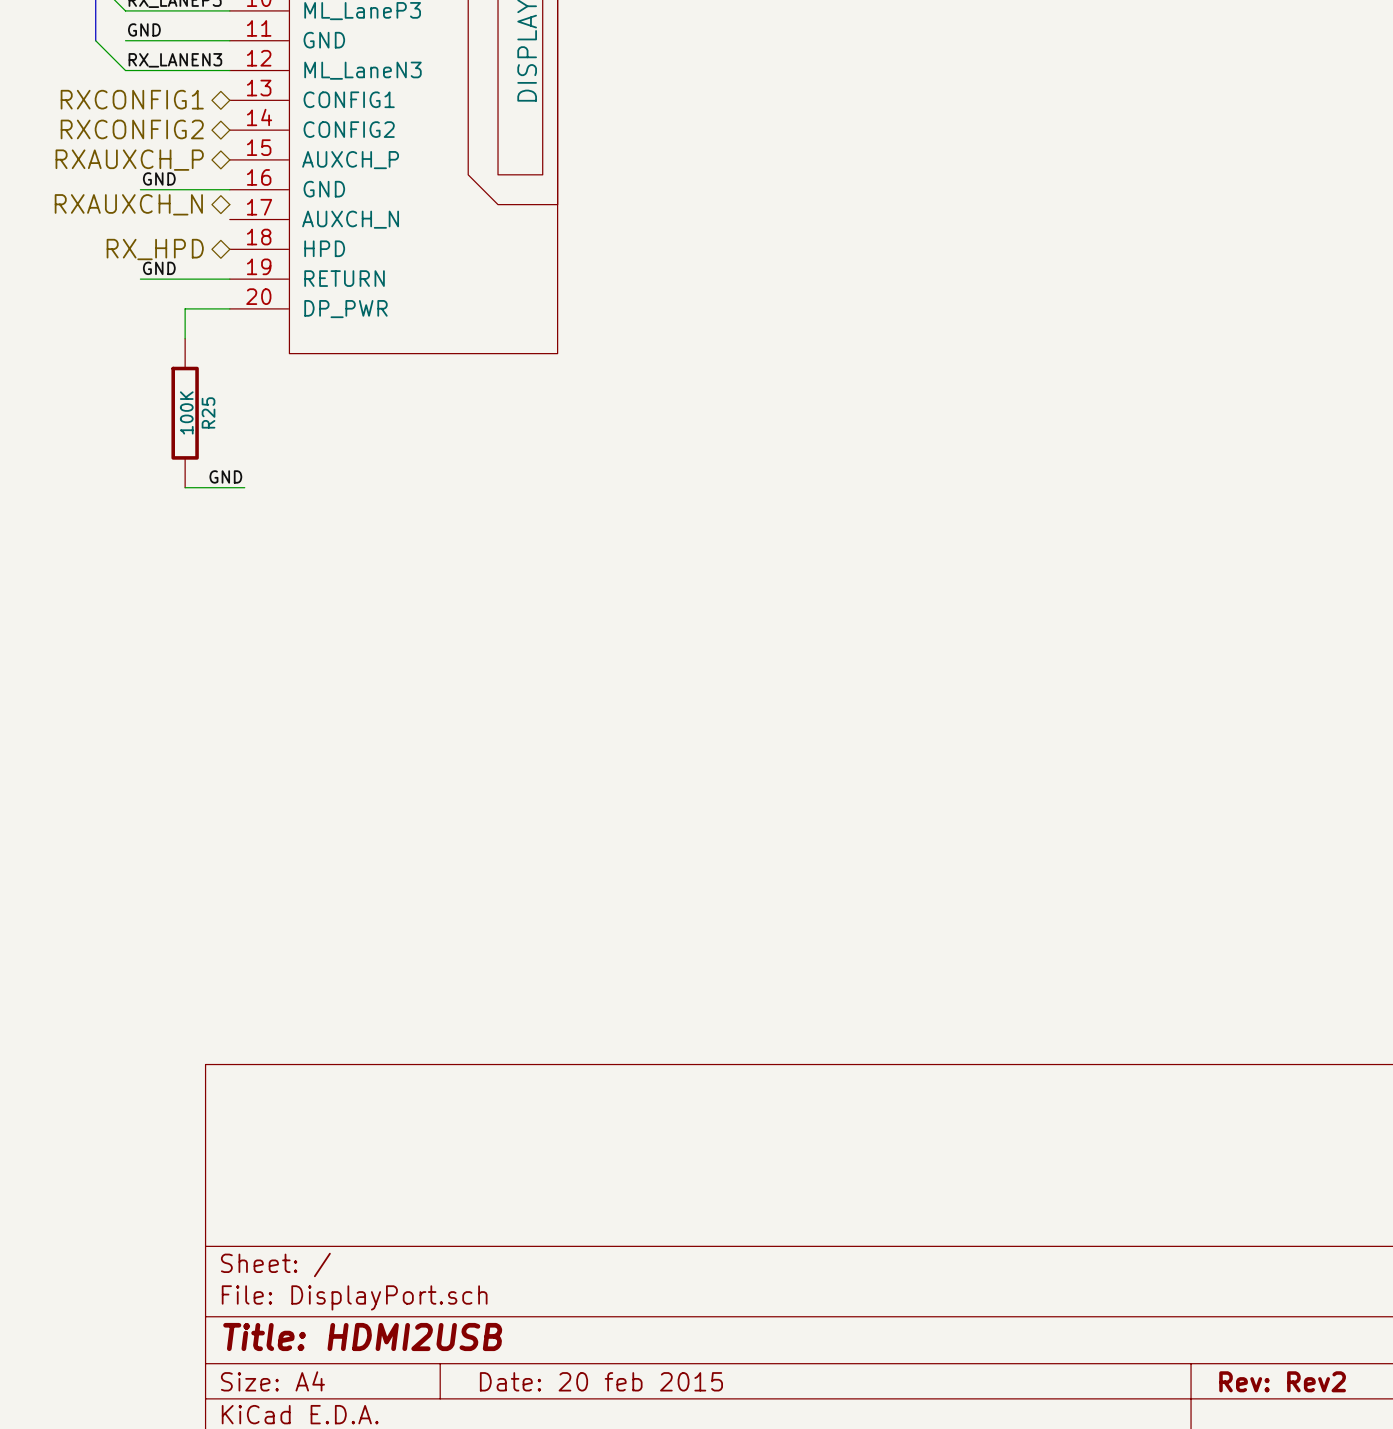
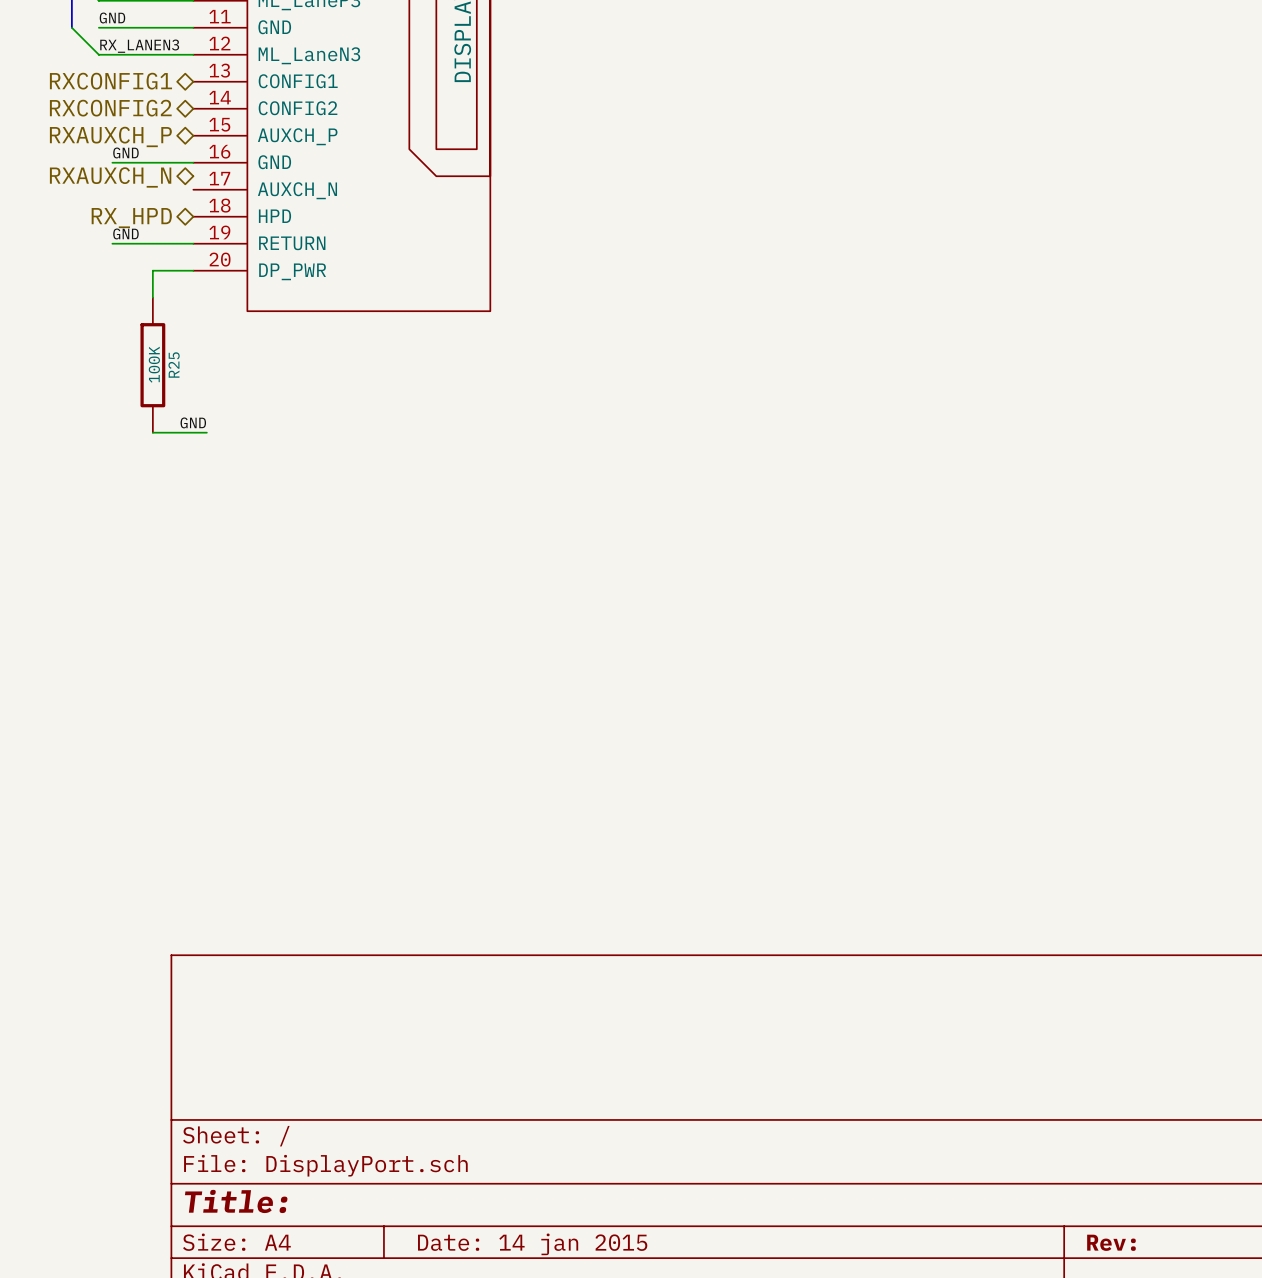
title block: Title: HDMI2USB (362, 1337) -> Title: (236, 1201)
title block: Date: 20 feb 2015 (601, 1381) -> Date: 14 jan 2015 (532, 1244)
title block: Rev: Rev2 (1282, 1381) -> Rev: (1111, 1242)

